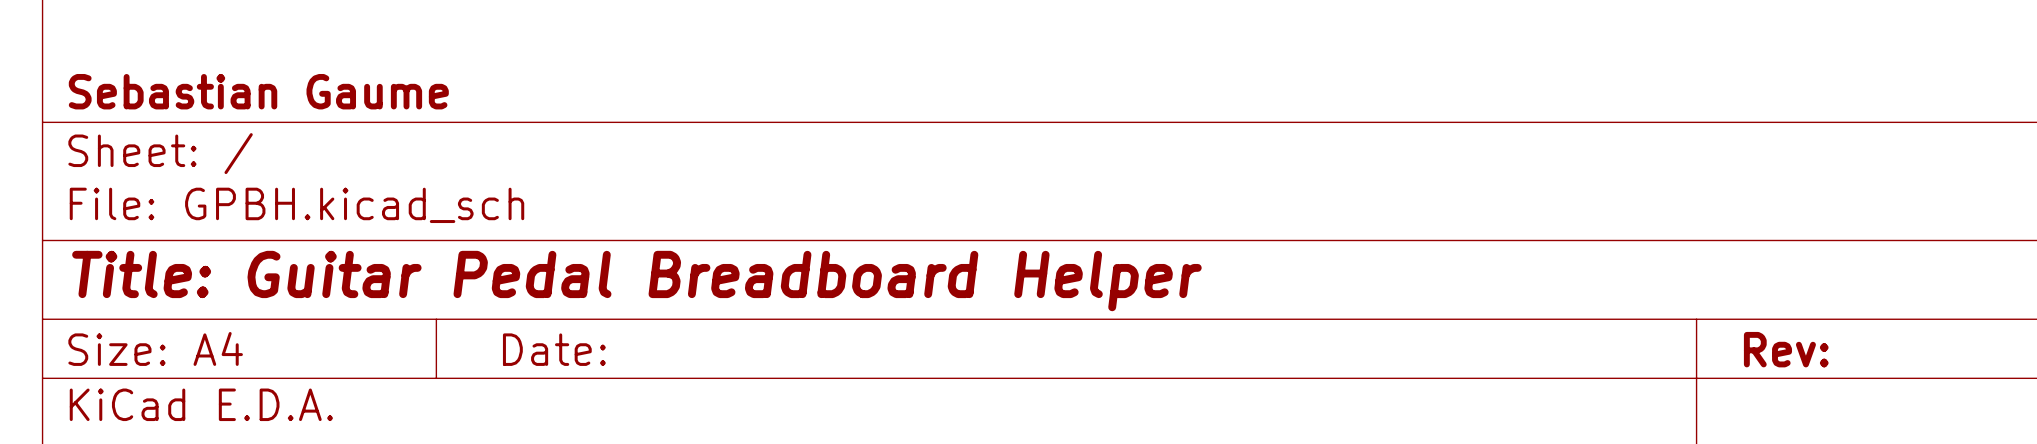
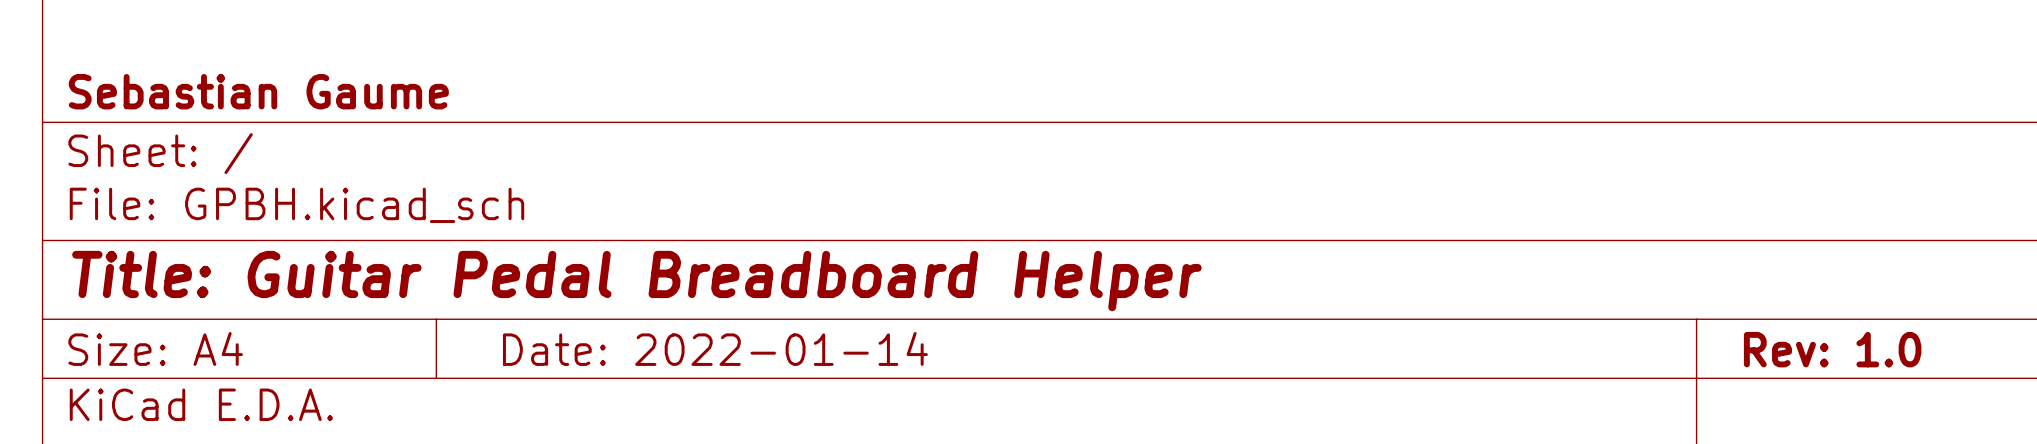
title block: Date: (554, 349) -> Date: 2022-01-14 (715, 348)
title block: Rev: (1786, 349) -> Rev: 1.0 (1832, 349)

